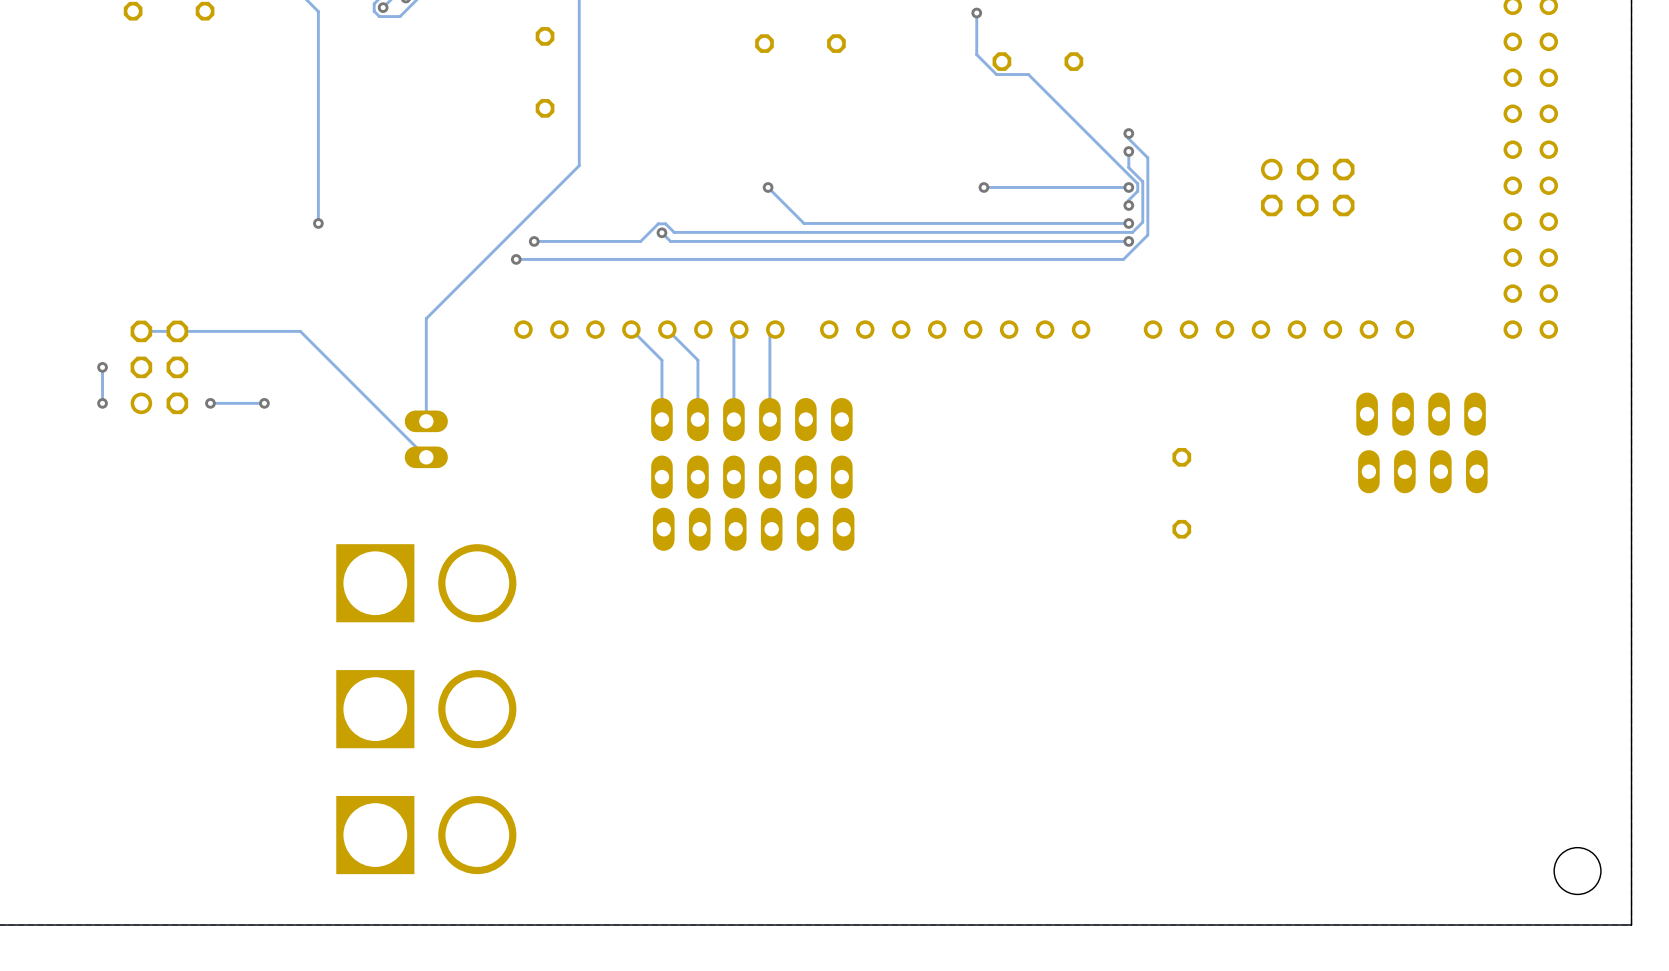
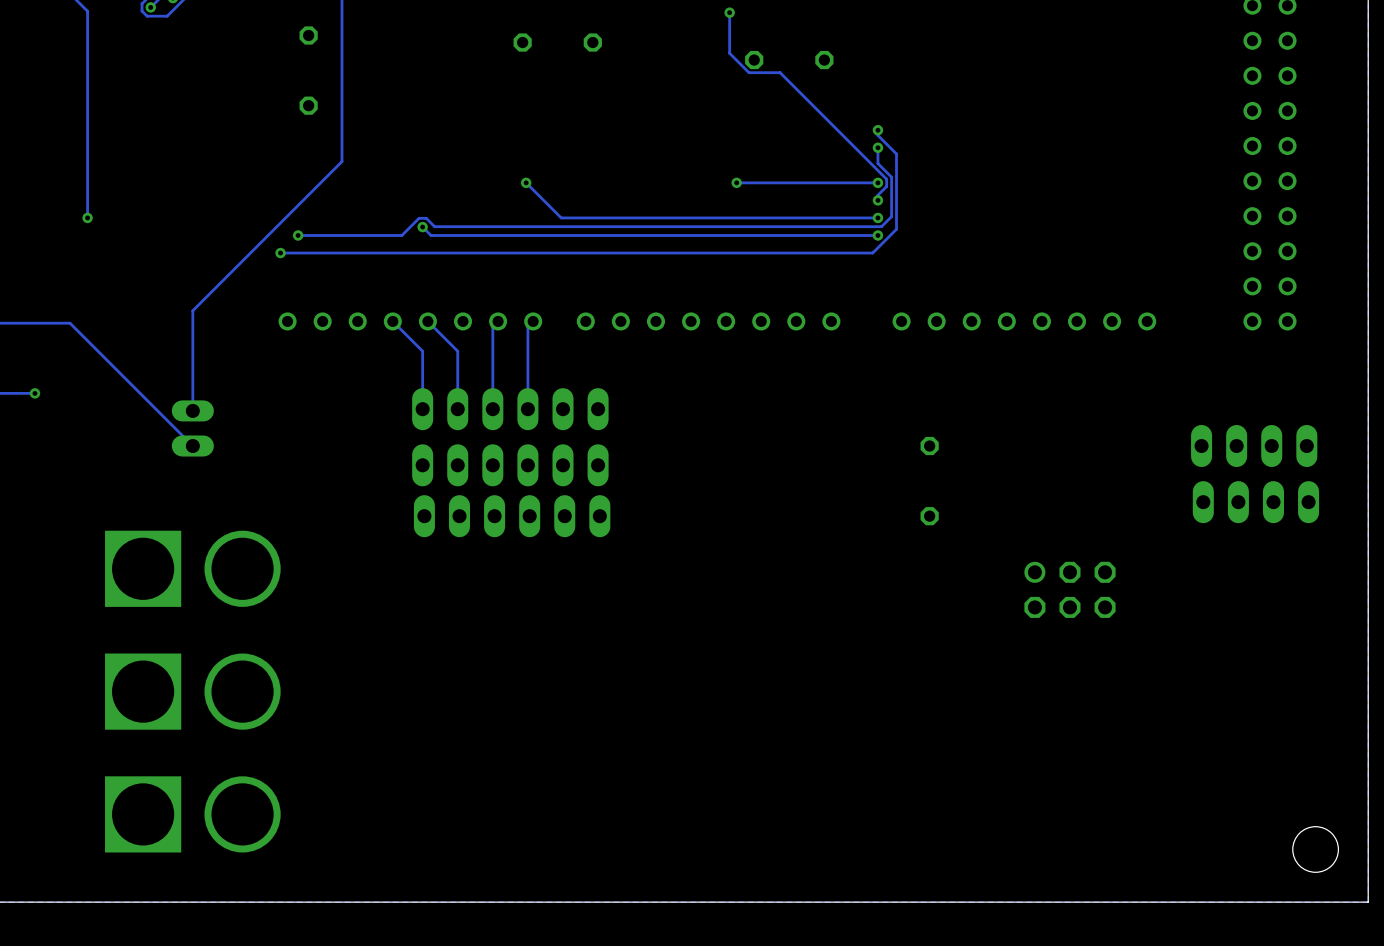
part: (1307, 187) -> none
part: (1421, 414) -> none
part: none -> (1254, 446)
part: (1422, 471) -> none
part: none -> (1255, 502)
part: none -> (1069, 589)

